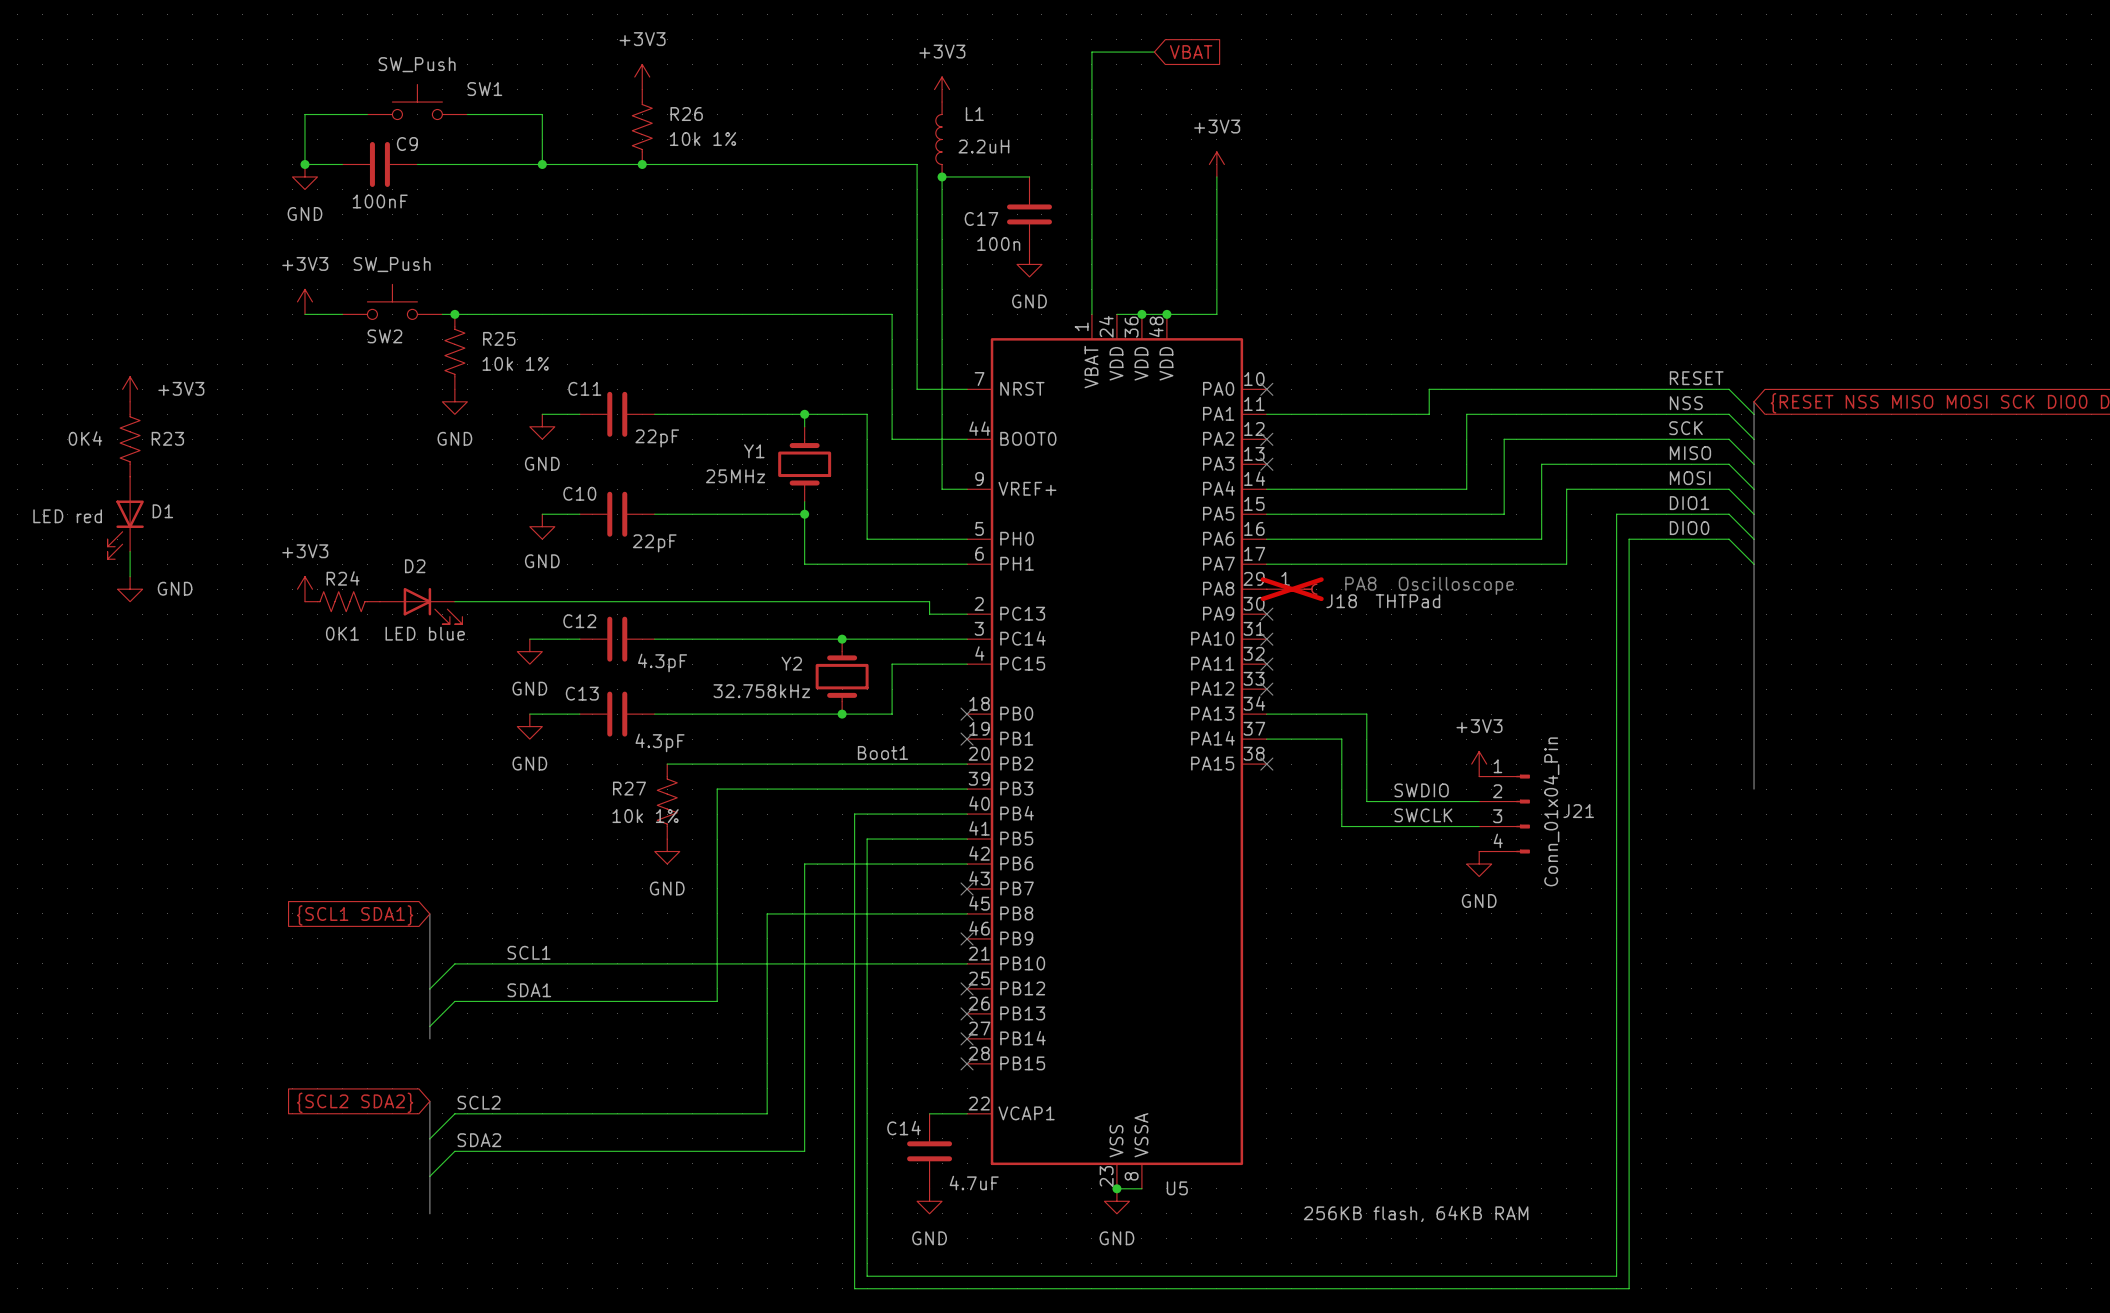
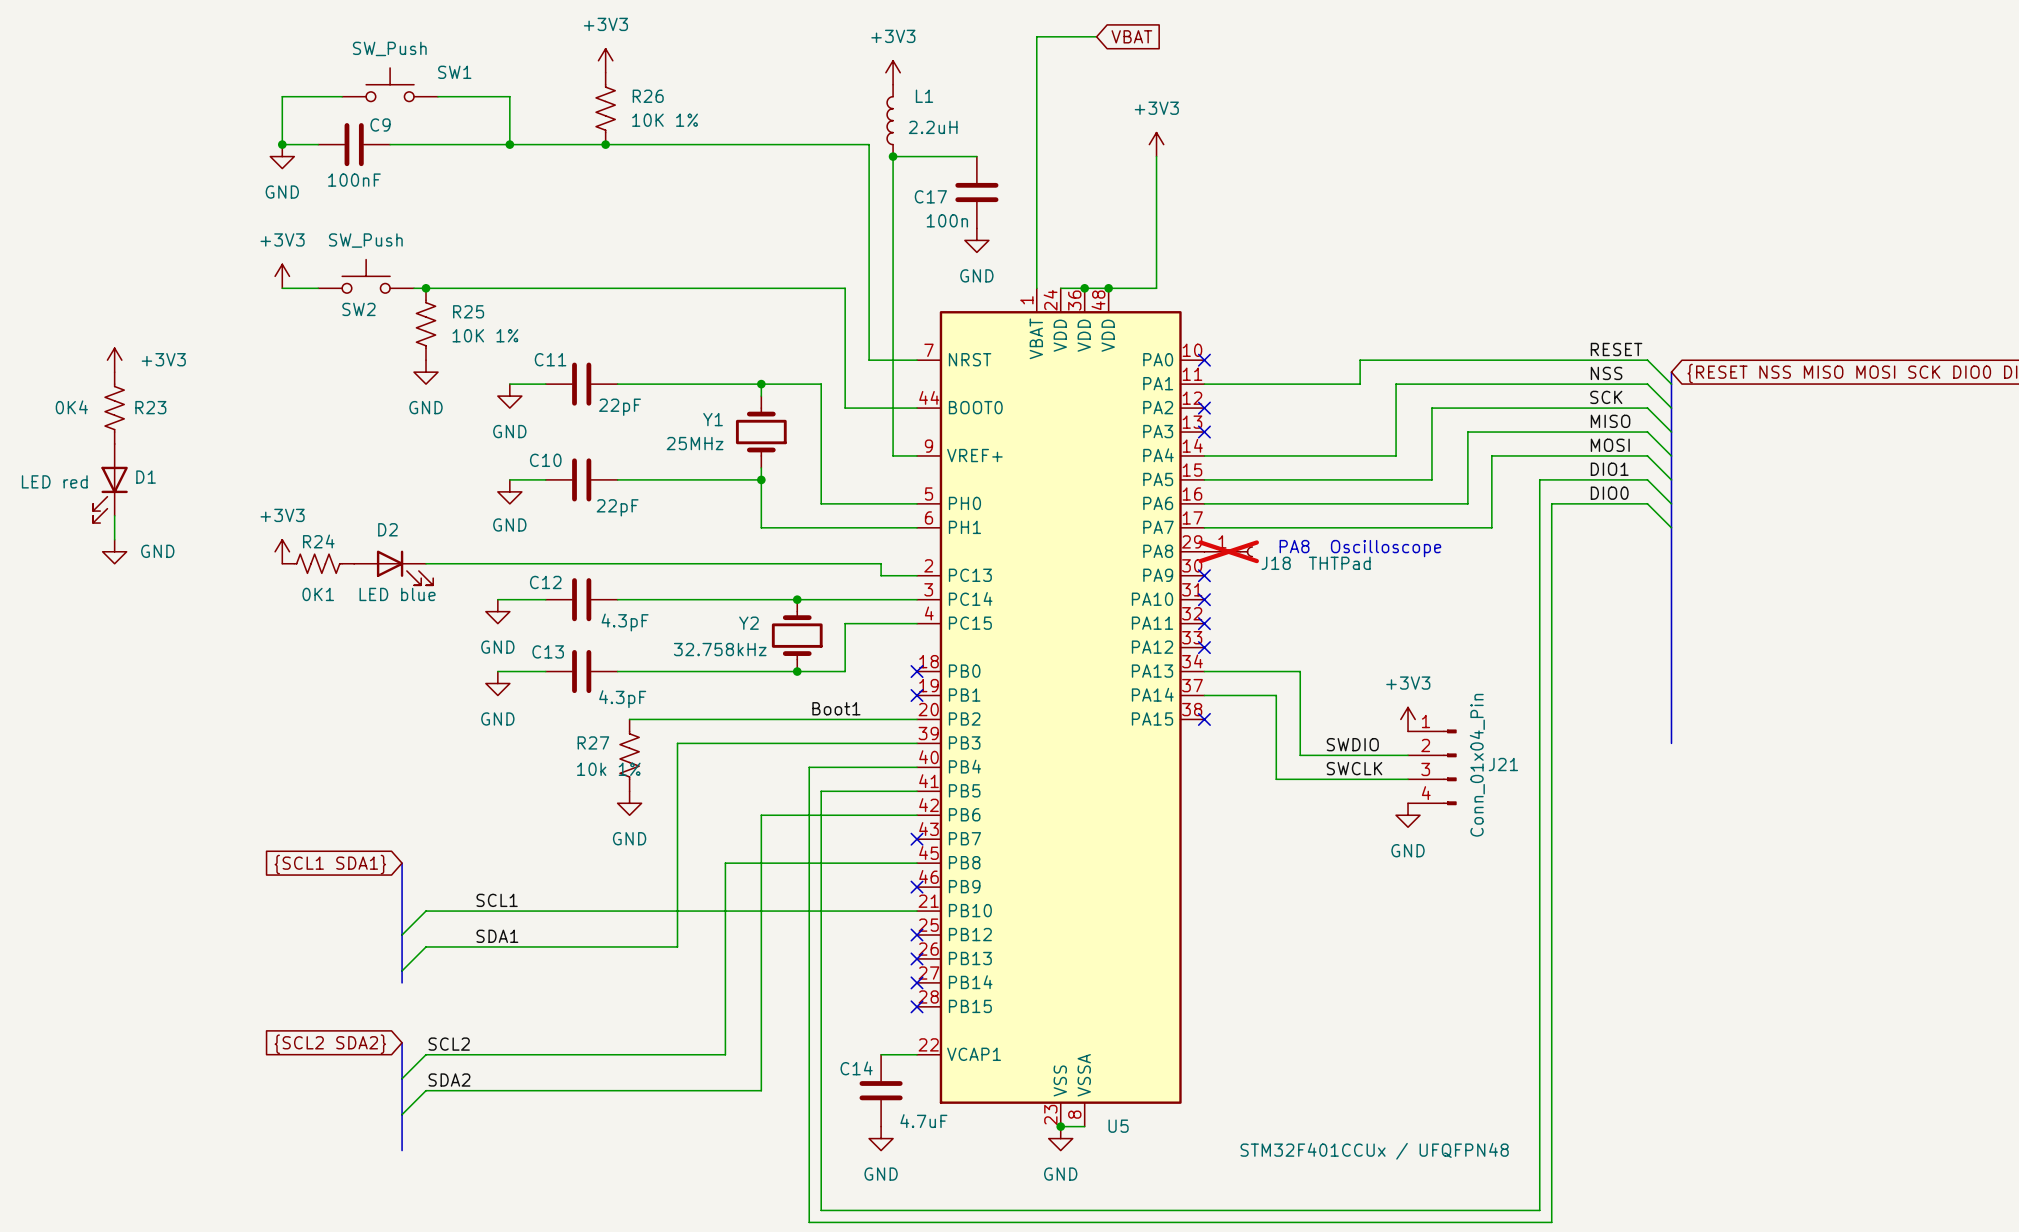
R26 value: 10k 1% (703, 139) -> 10K 1% (665, 120)
R25 value: 10k 1% (515, 363) -> 10K 1% (485, 335)
U5 value: 256KB flash, 64KB RAM (1416, 1213) -> STM32F401CCUx / UFQFPN48 (1374, 1151)

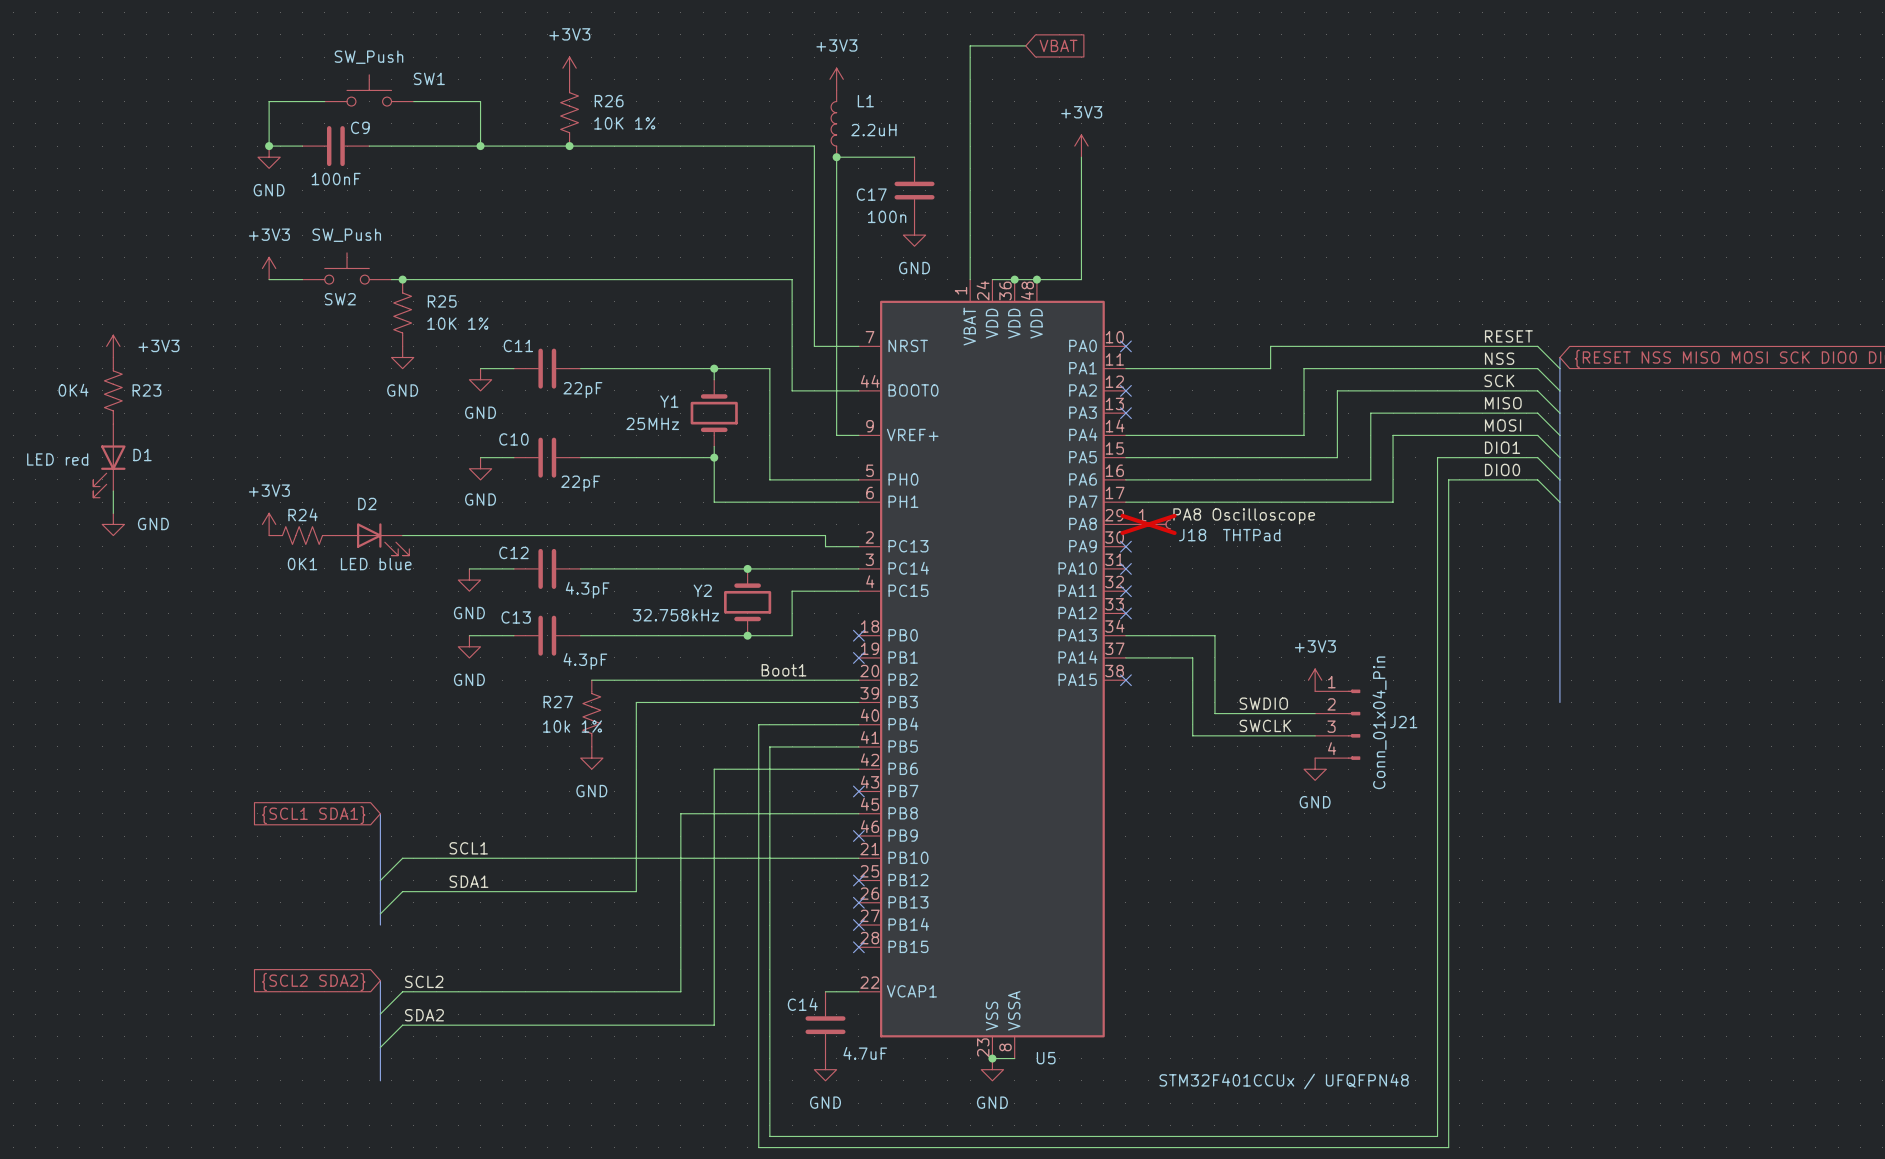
label: none -> PA8 Oscilloscope (1244, 516)
text: PA8 Oscilloscope (1360, 548) -> none

